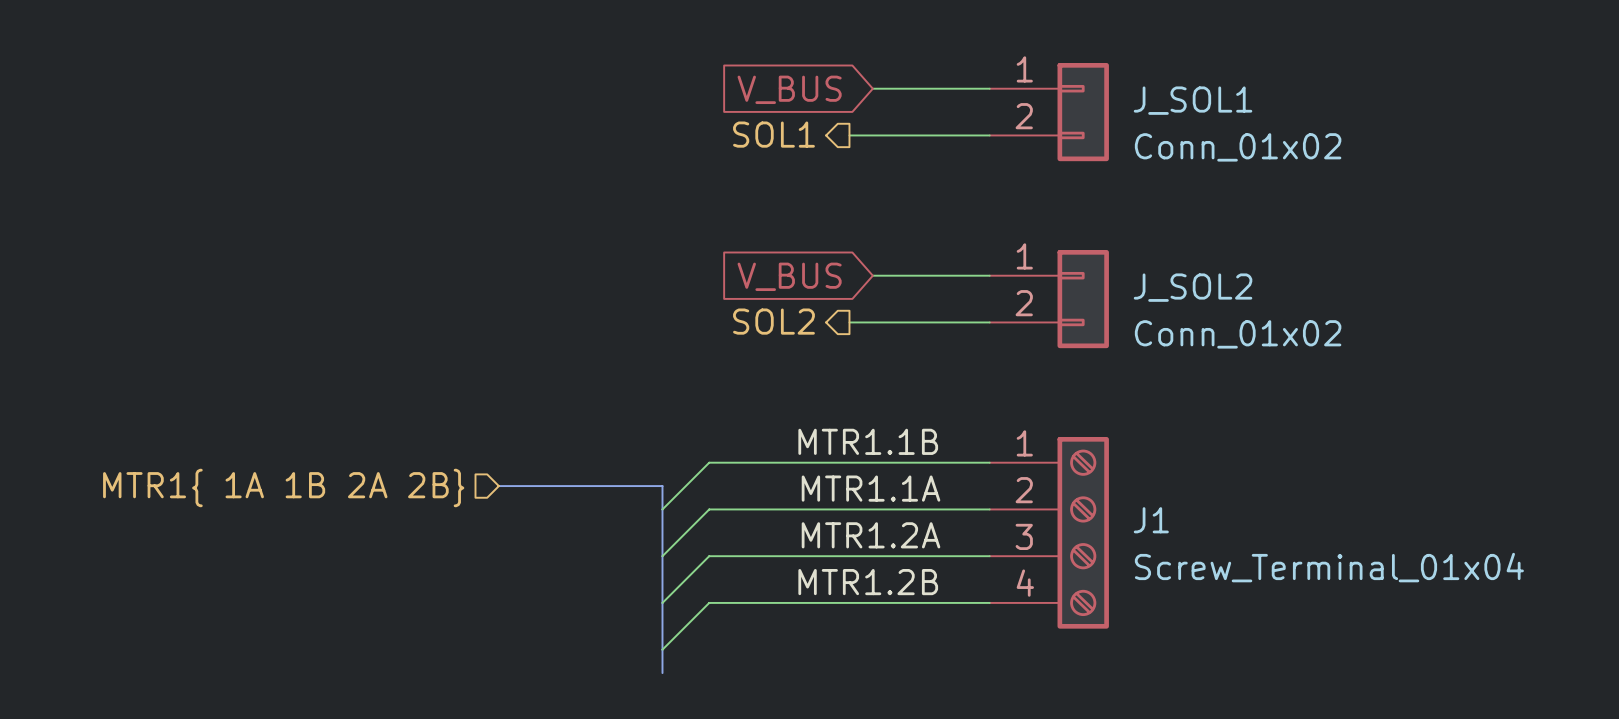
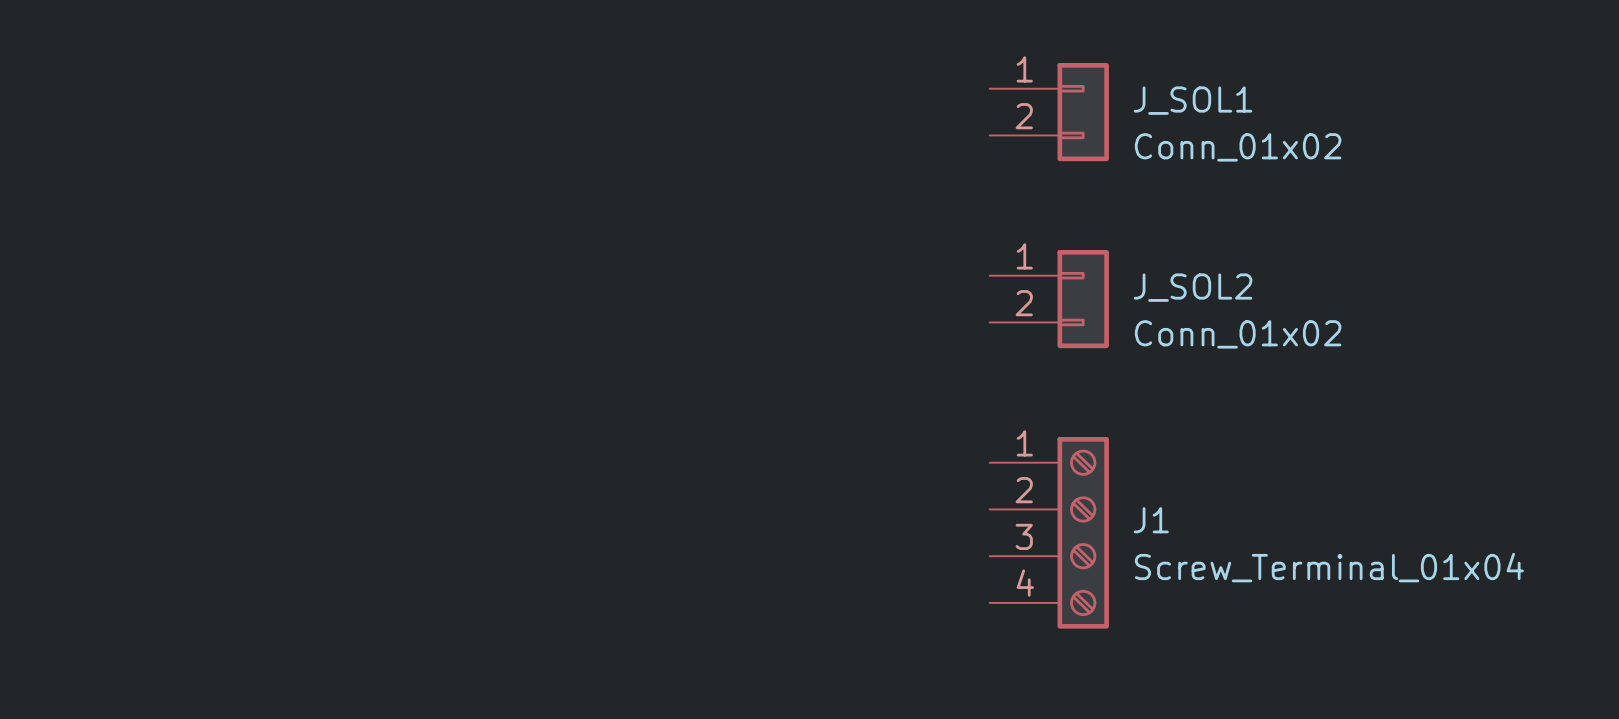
wire: (872, 88) (989, 88) -> none
global label: V_BUS (789, 89) -> none
hierarchical label: SOL1 (773, 134) -> none
wire: (849, 135) (989, 135) -> none
wire: (872, 275) (989, 275) -> none
global label: V_BUS (789, 276) -> none
hierarchical label: SOL2 (773, 321) -> none
wire: (849, 322) (989, 322) -> none
label: MTR1.1B (868, 441) -> none
wire: (989, 462) (709, 462) (662, 509) -> none
bus: (498, 486) (662, 486) (662, 673) -> none
hierarchical label: MTR1{ 1A 1B 2A 2B} (283, 487) -> none
label: MTR1.1A (871, 488) -> none
wire: (989, 509) (709, 509) (662, 556) -> none
label: MTR1.2A (871, 535) -> none
wire: (989, 556) (709, 556) (662, 602) -> none
label: MTR1.2B (868, 582) -> none
wire: (989, 602) (709, 602) (662, 649) -> none

